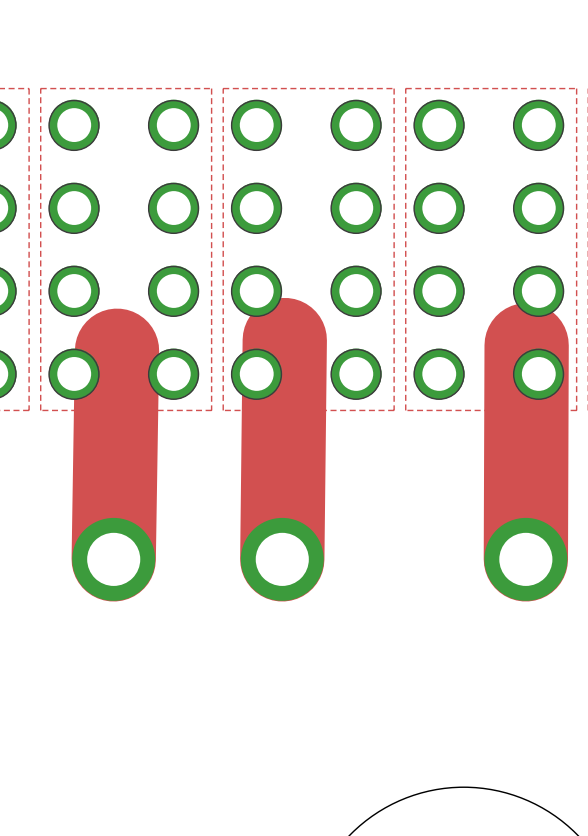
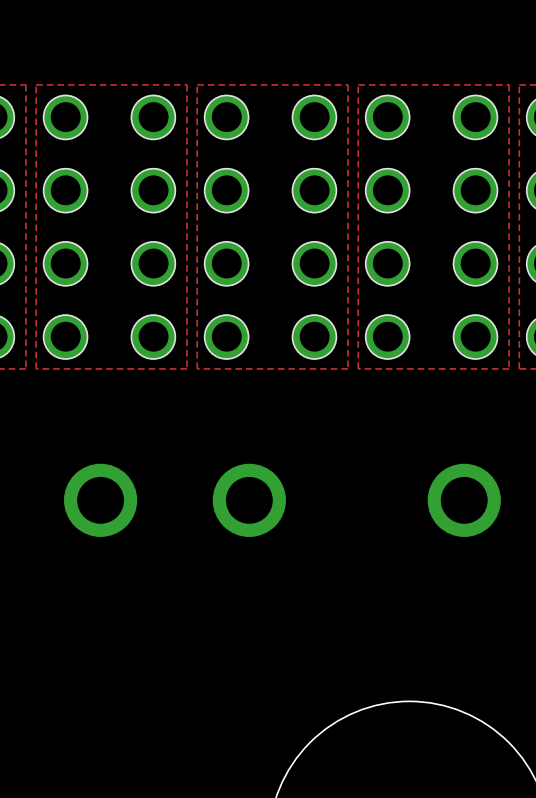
top track: (284, 340) (282, 559) -> none
top track: (526, 345) (525, 559) -> none
top track: (117, 350) (113, 559) -> none

